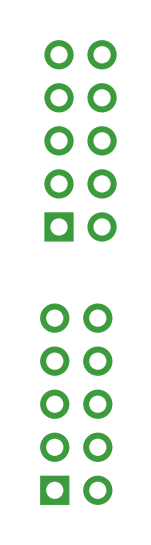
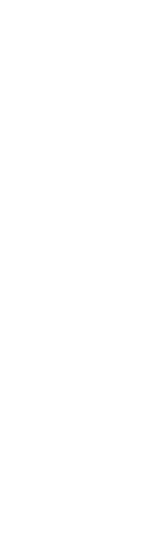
part: (80, 140) -> none
part: (76, 404) -> none

